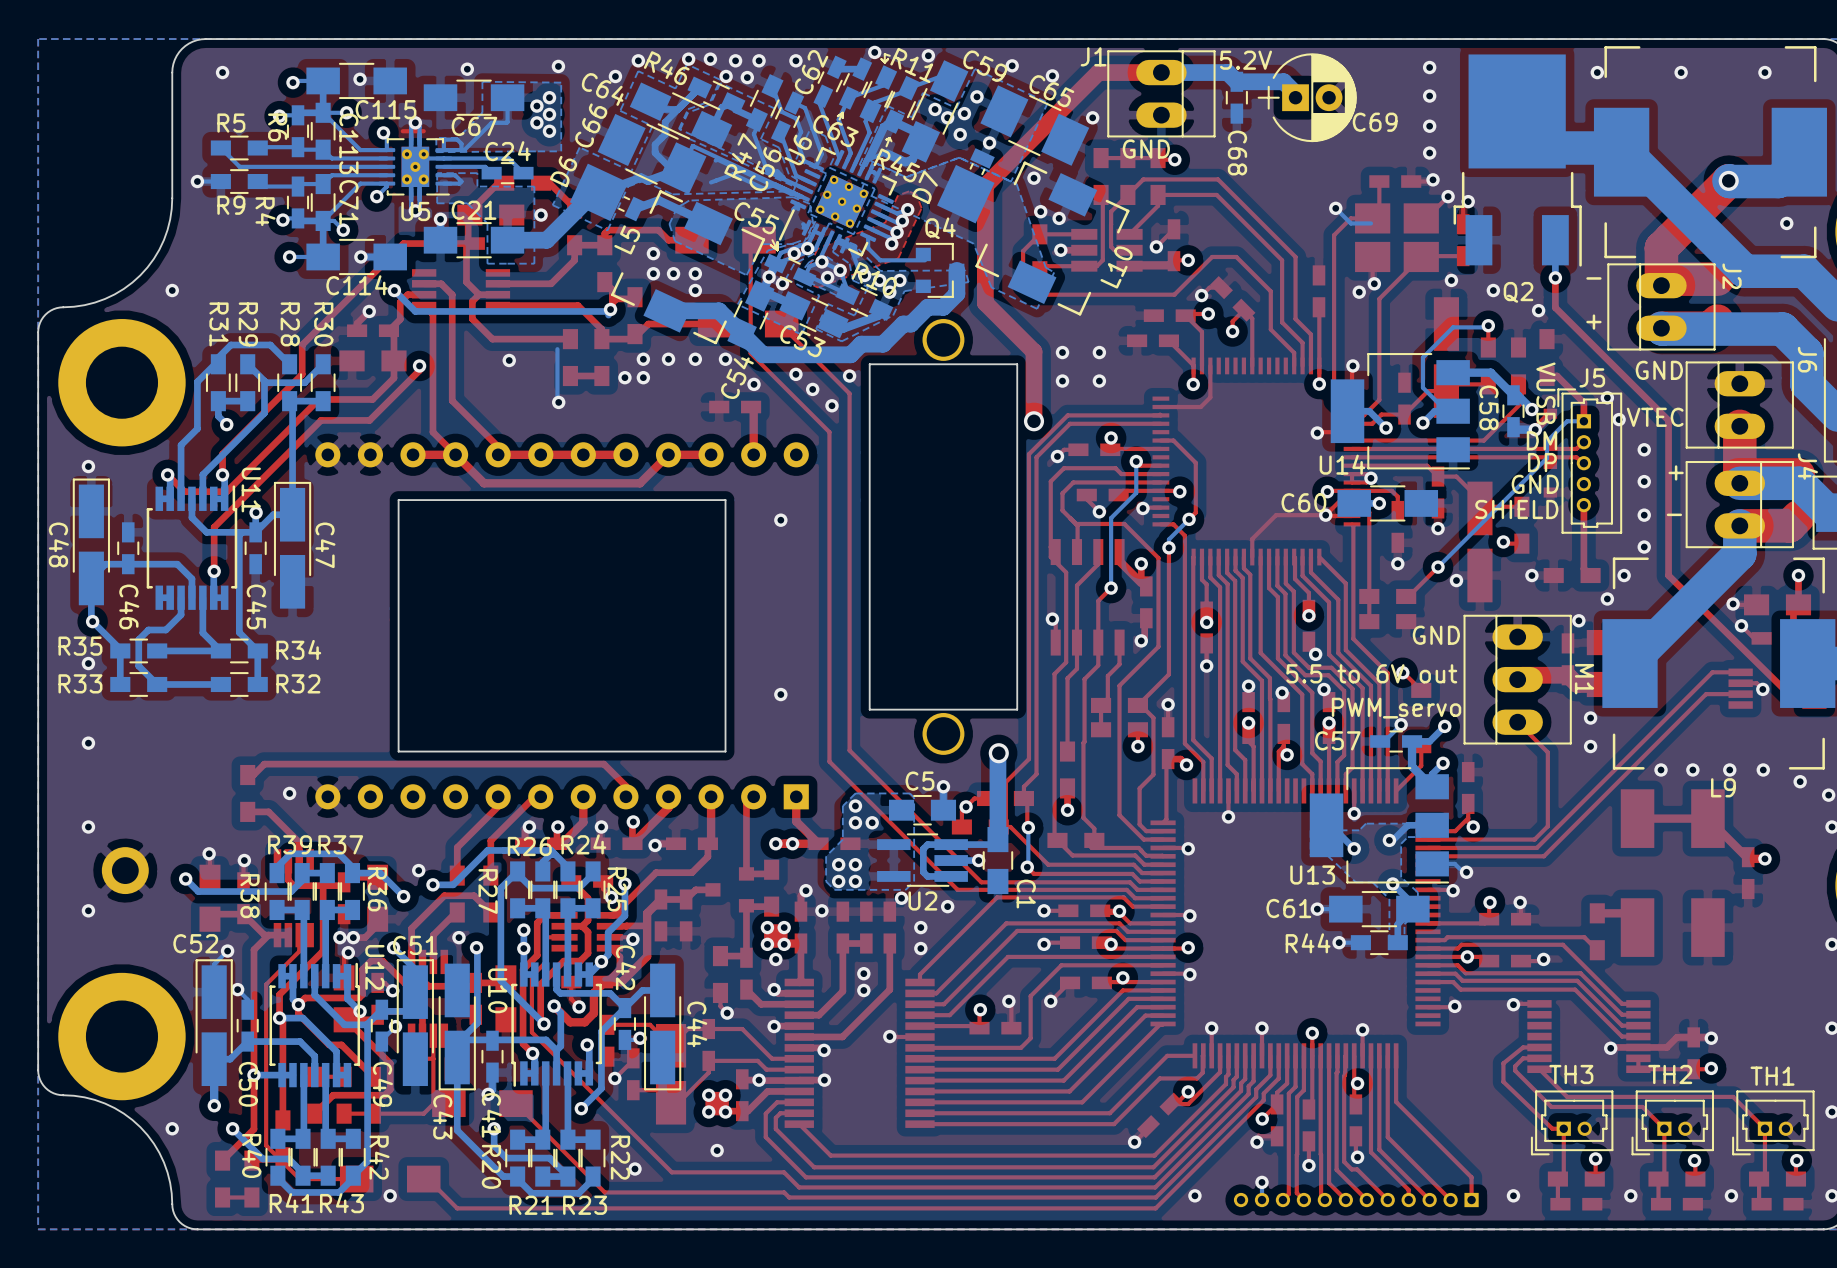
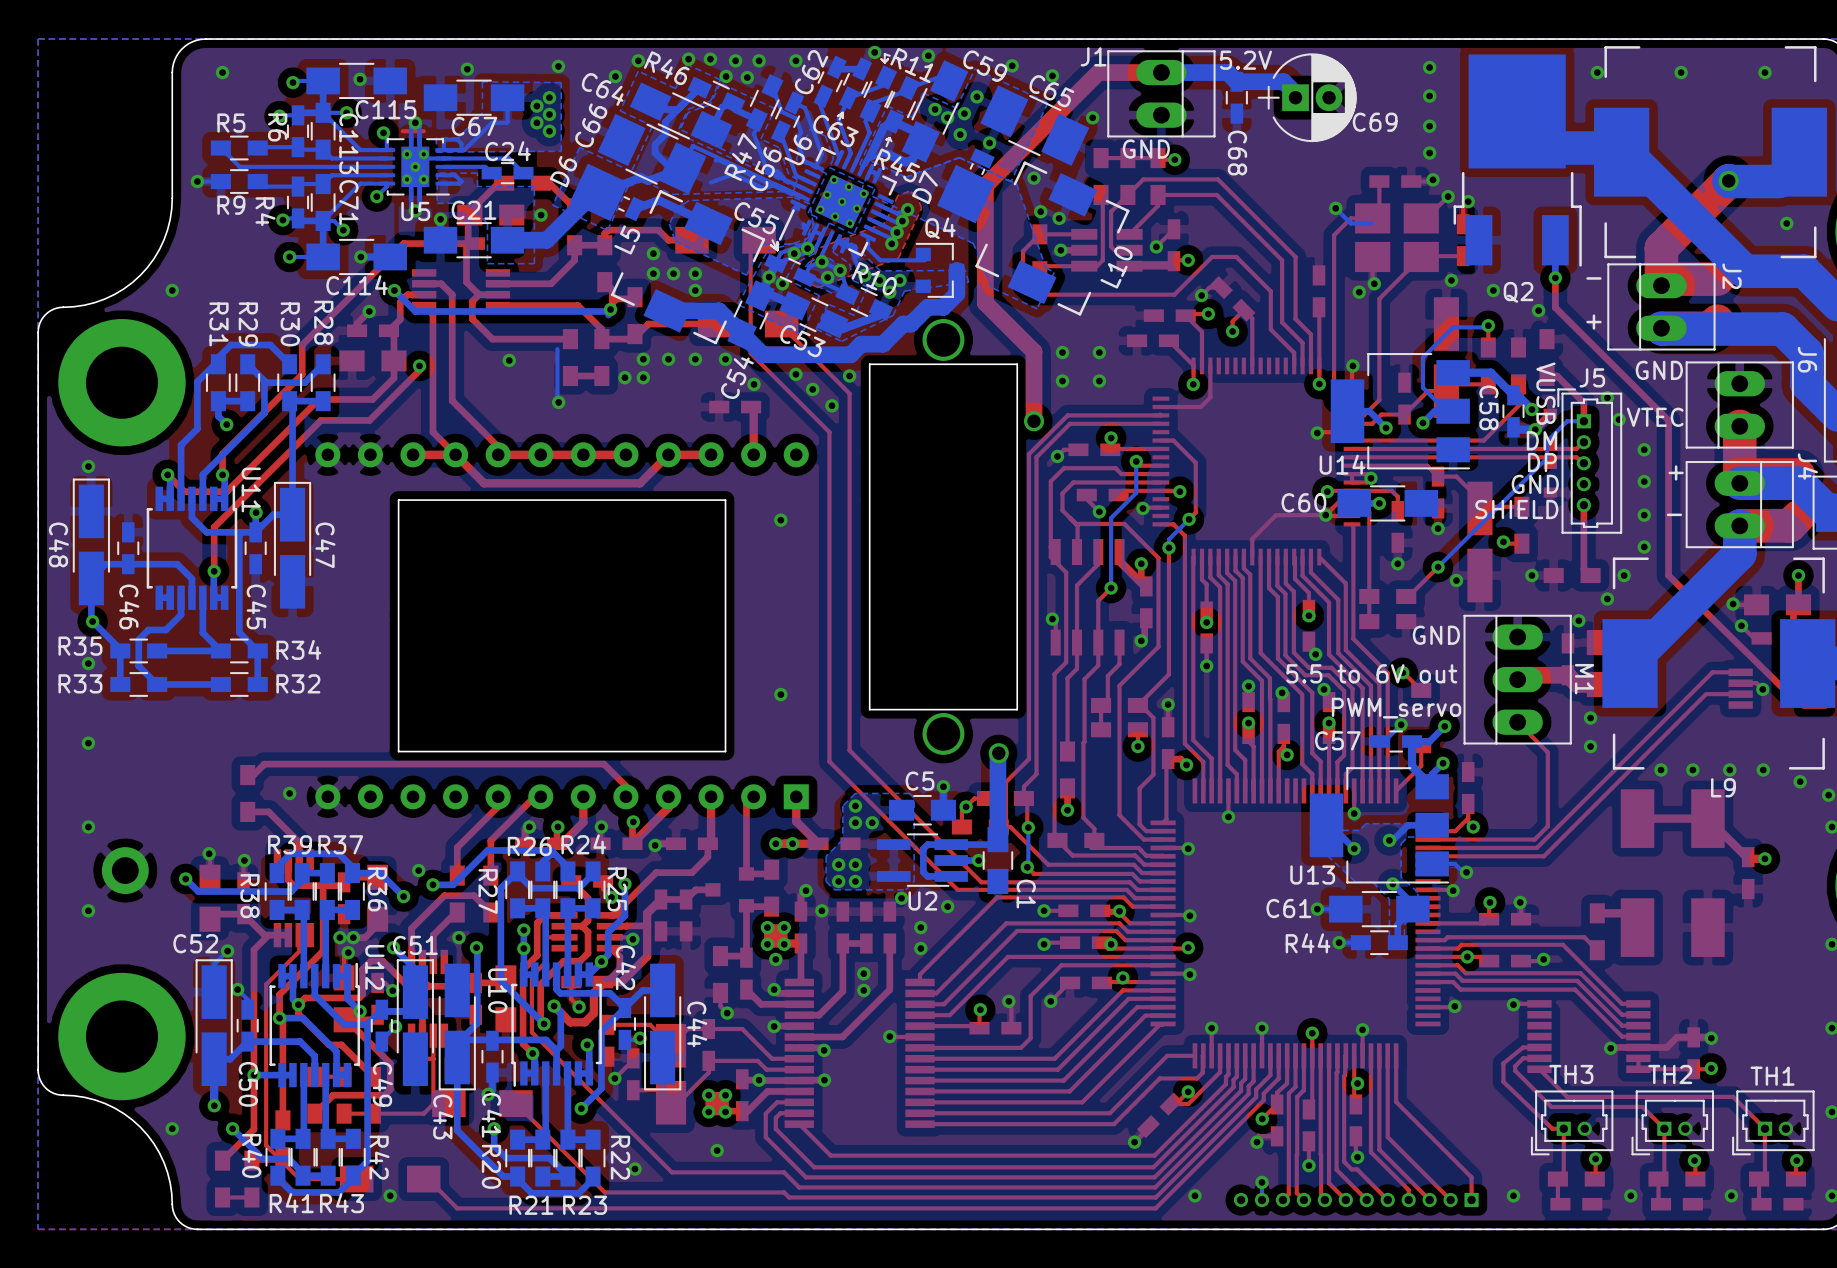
R28 name position: R28 (290, 324) -> R28 (323, 322)
R30 name position: R30 (323, 324) -> R30 (290, 324)

